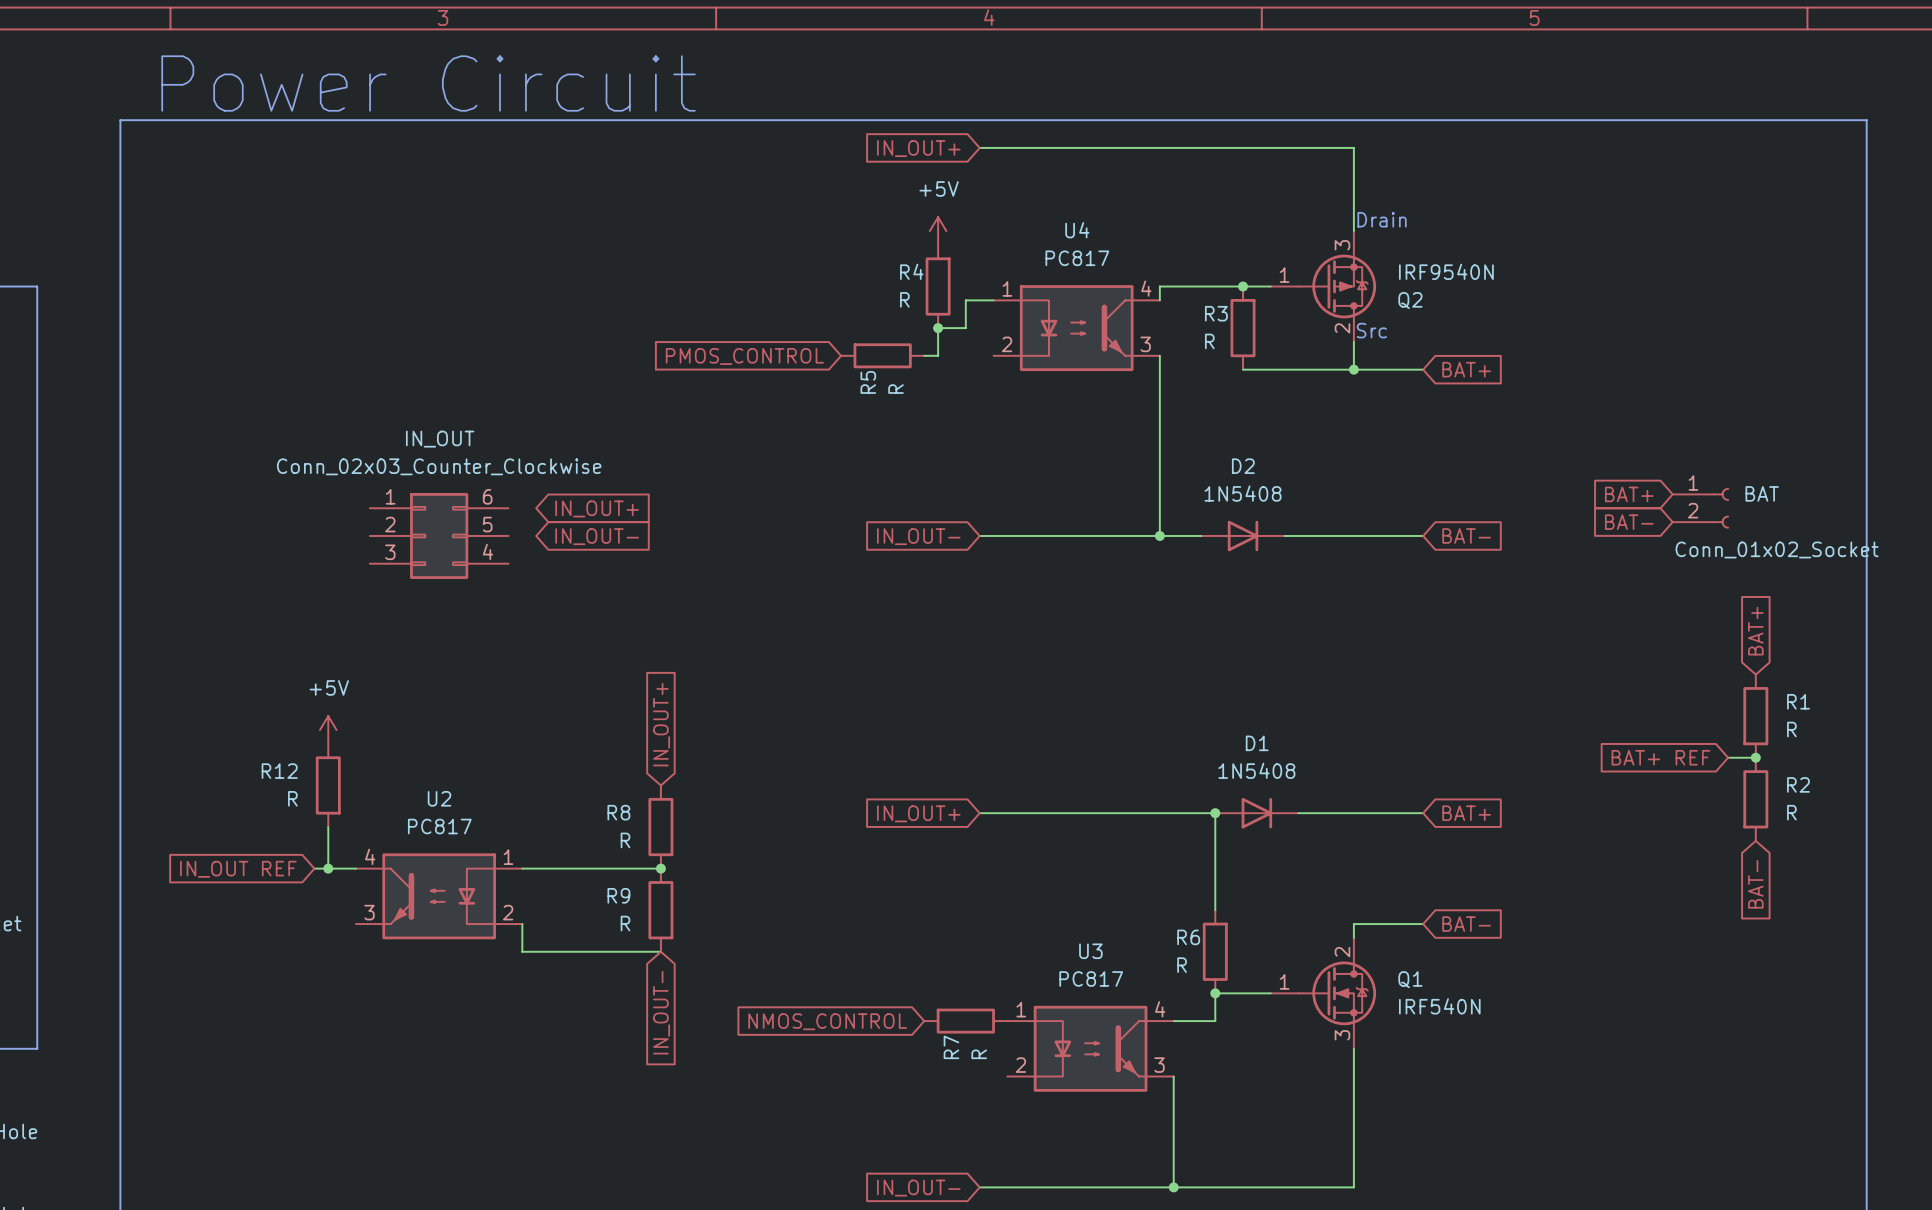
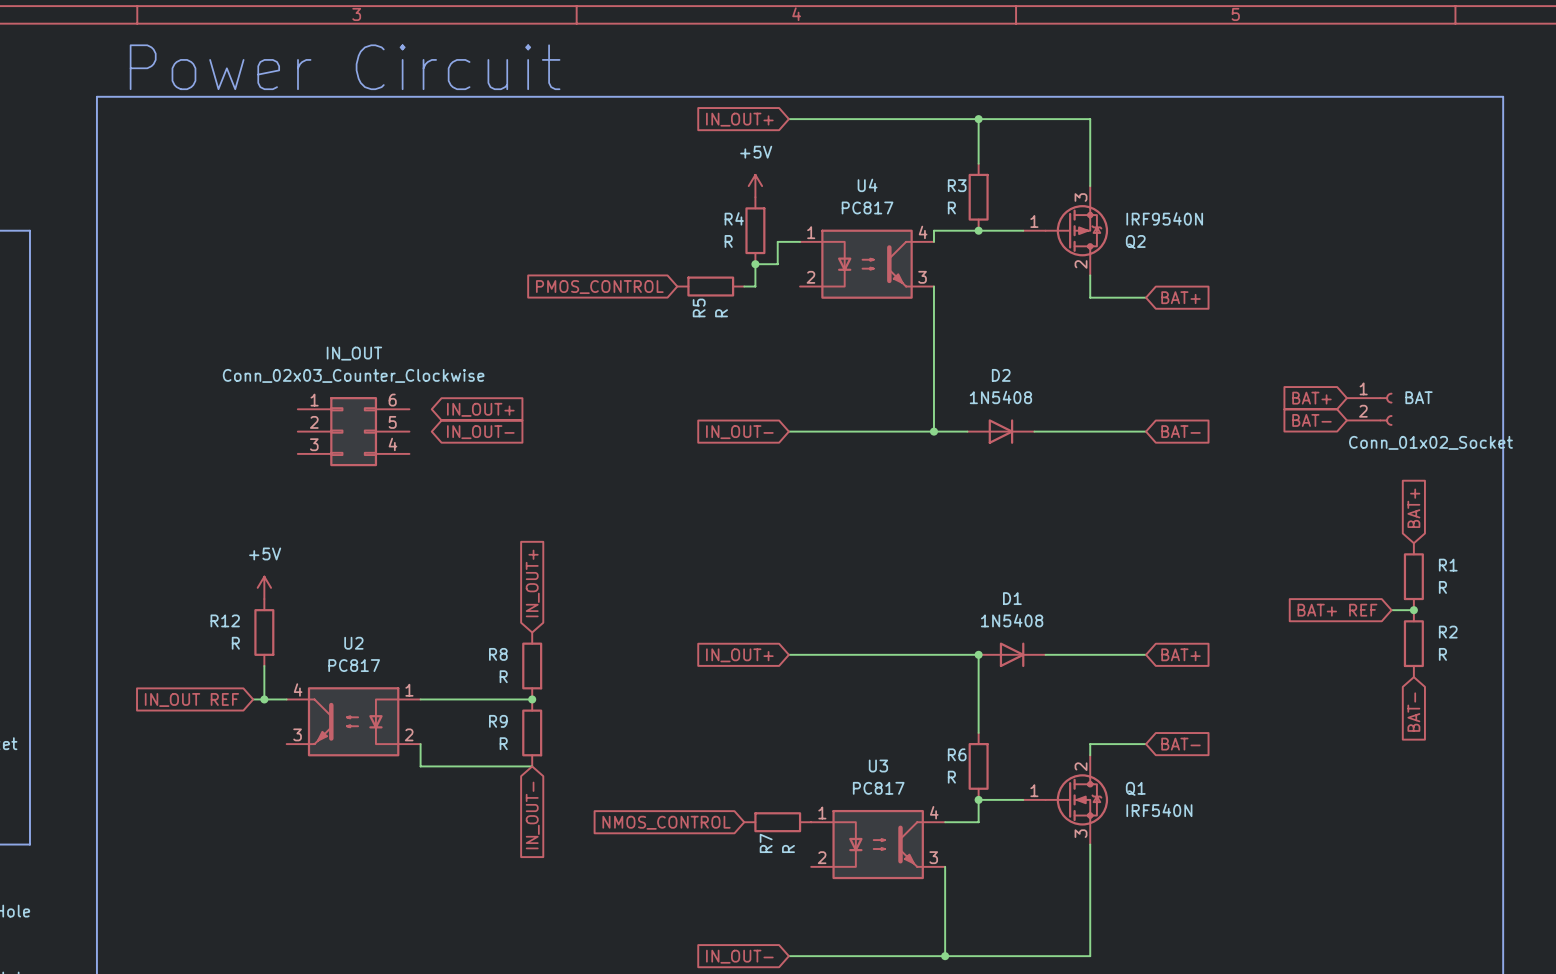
wire: none -> (978, 119) (978, 163)
junction: none -> (978, 119)
text: Drain (1382, 219) -> none
junction position: (1243, 286) -> (978, 230)
R3 position: (1243, 328) -> (978, 197)
text: Src (1371, 330) -> none
wire: (1243, 369) (1353, 369) -> none
junction: (1353, 369) -> none

